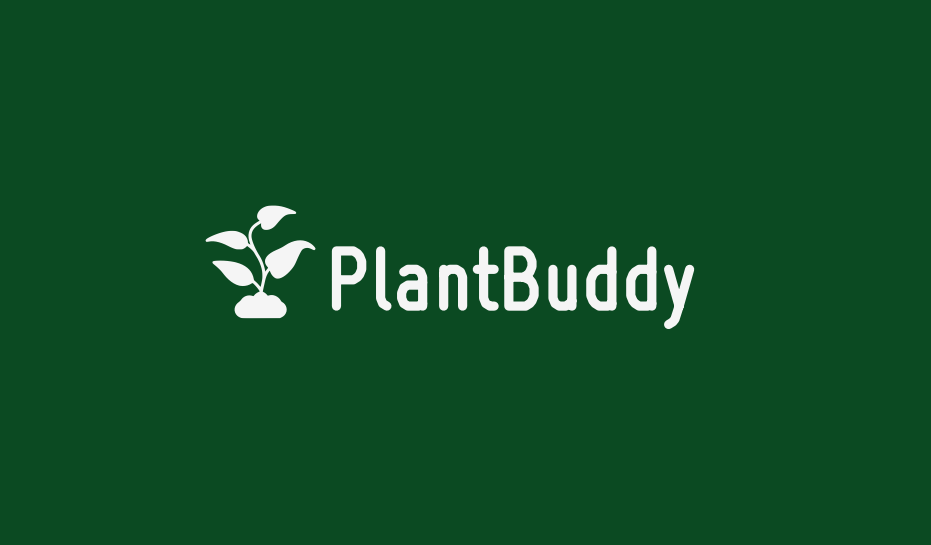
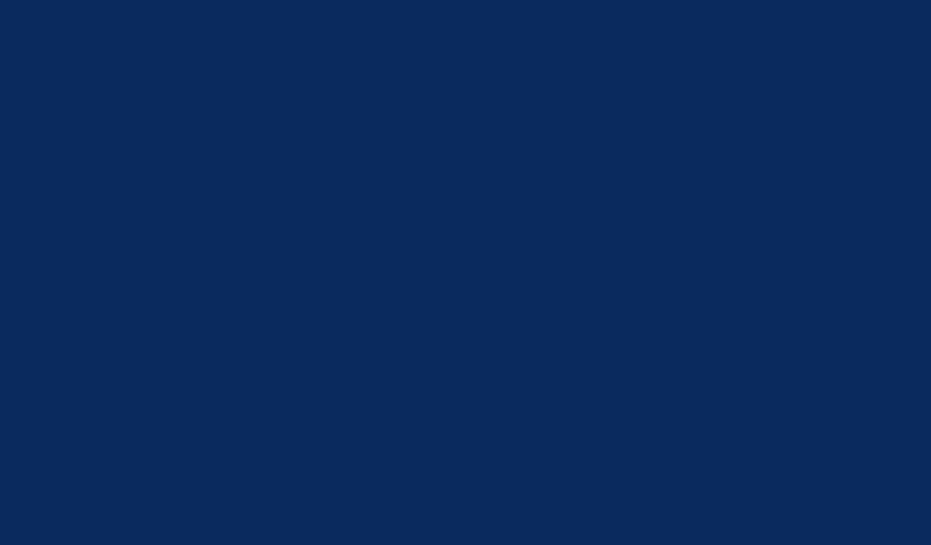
drawing: [205, 205, 316, 319] -> none
text: PlantBuddy (513, 287) -> none

